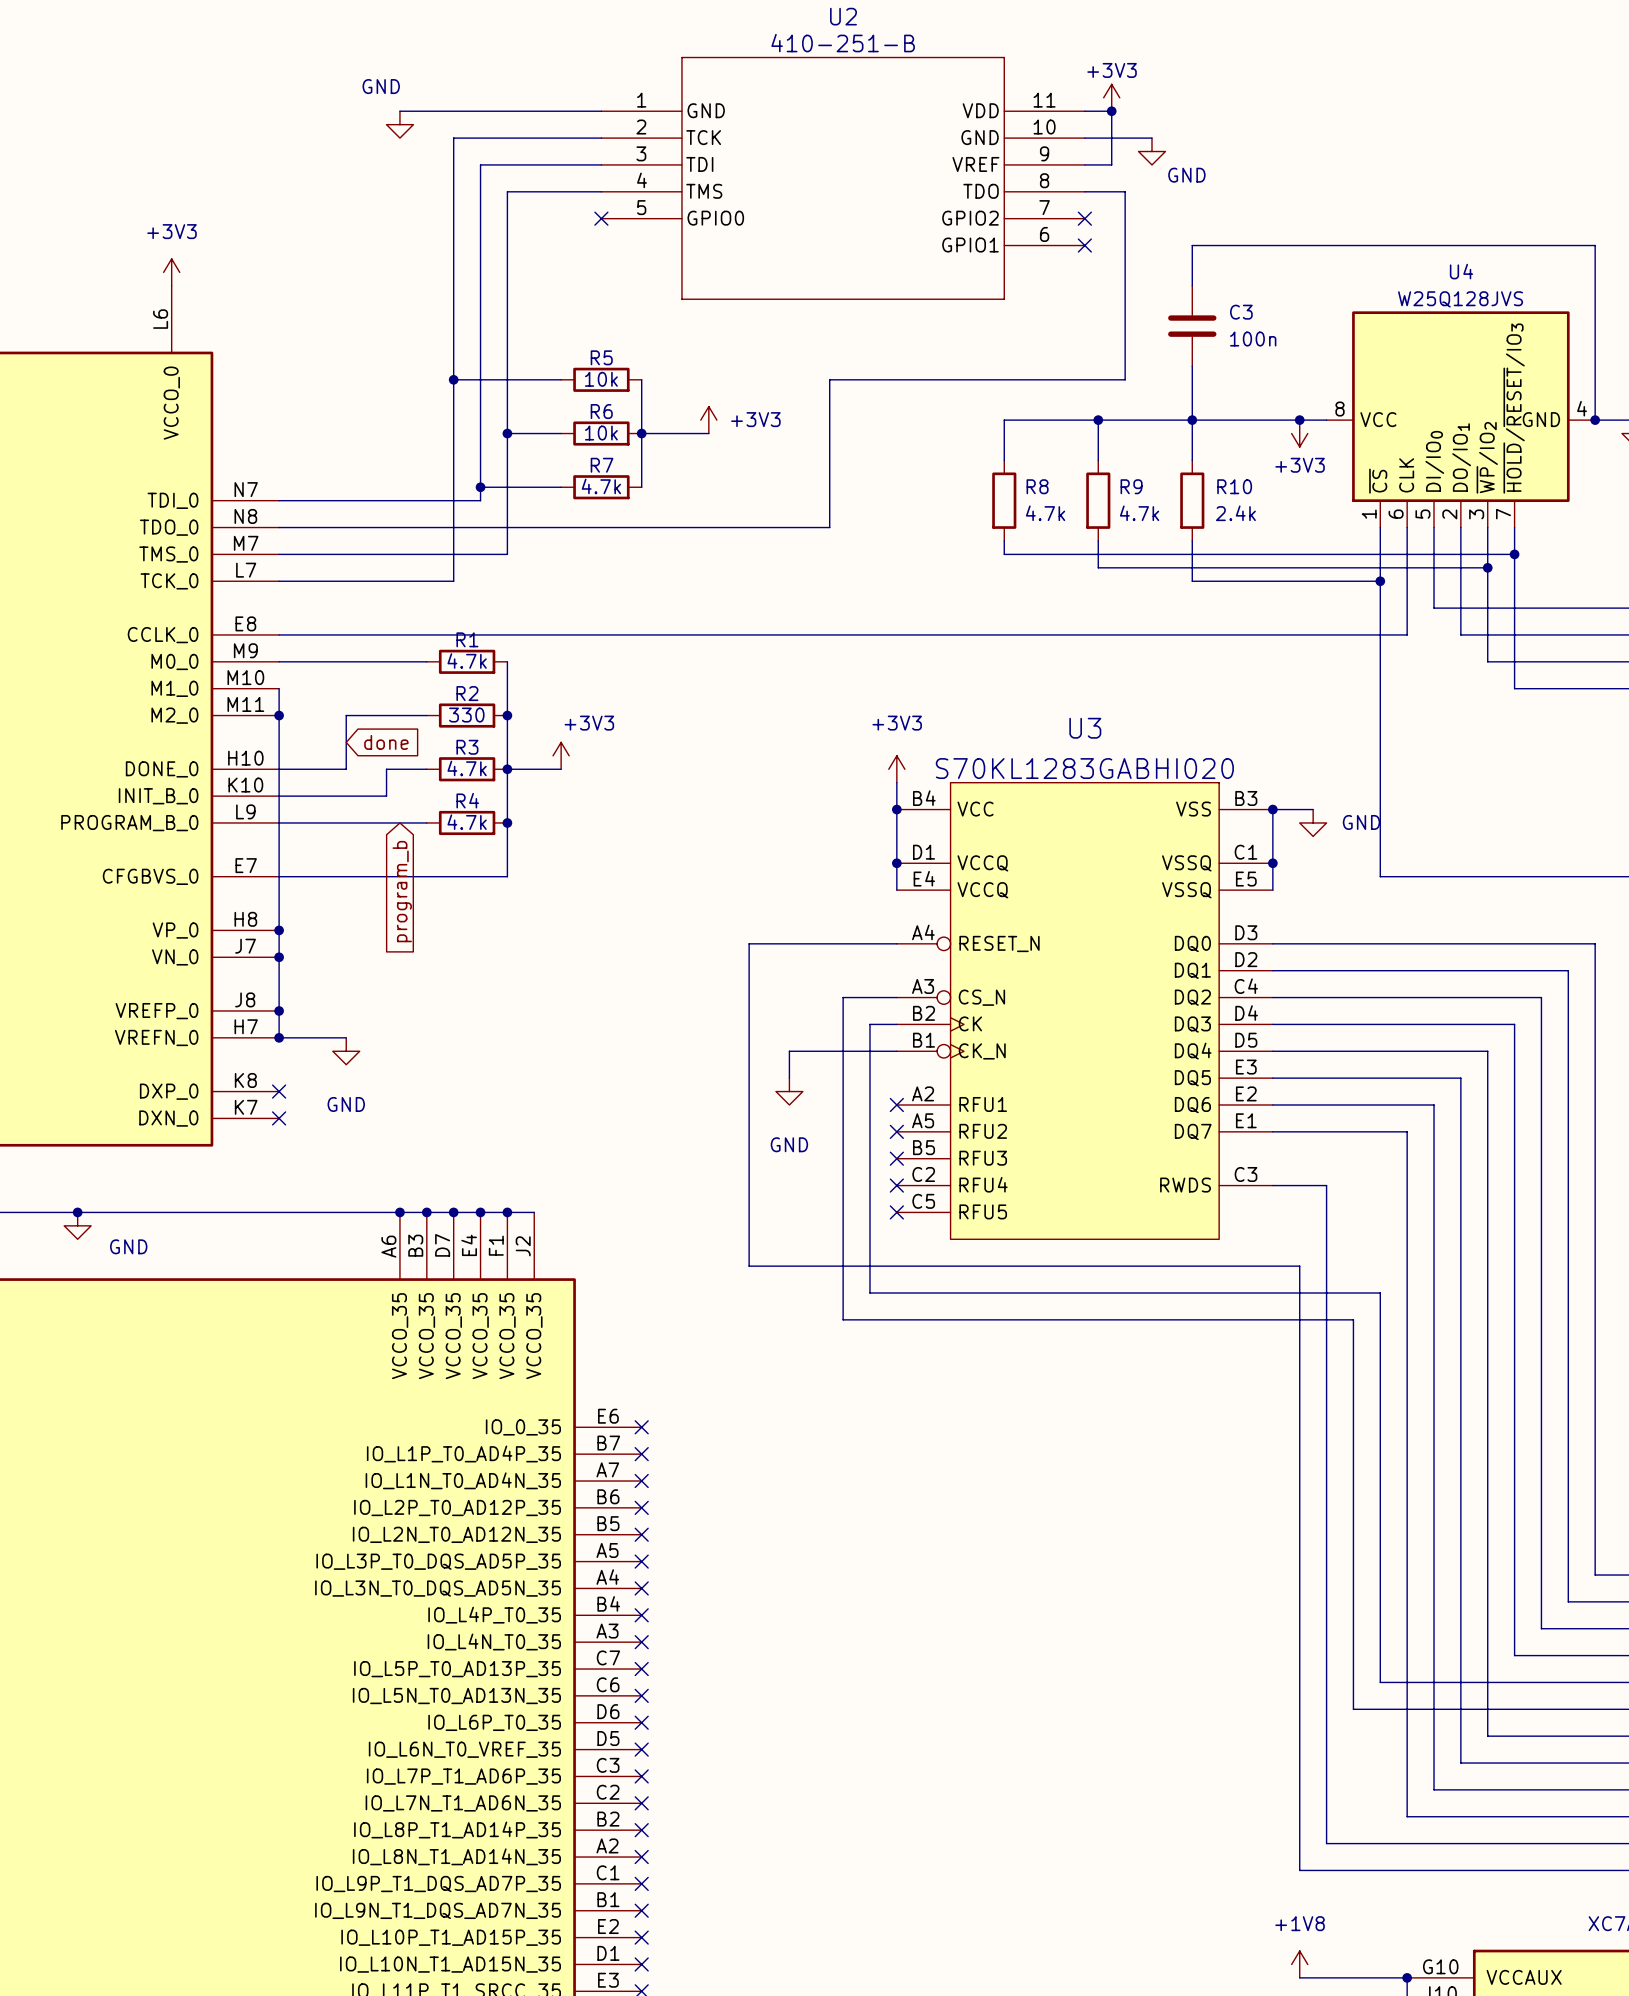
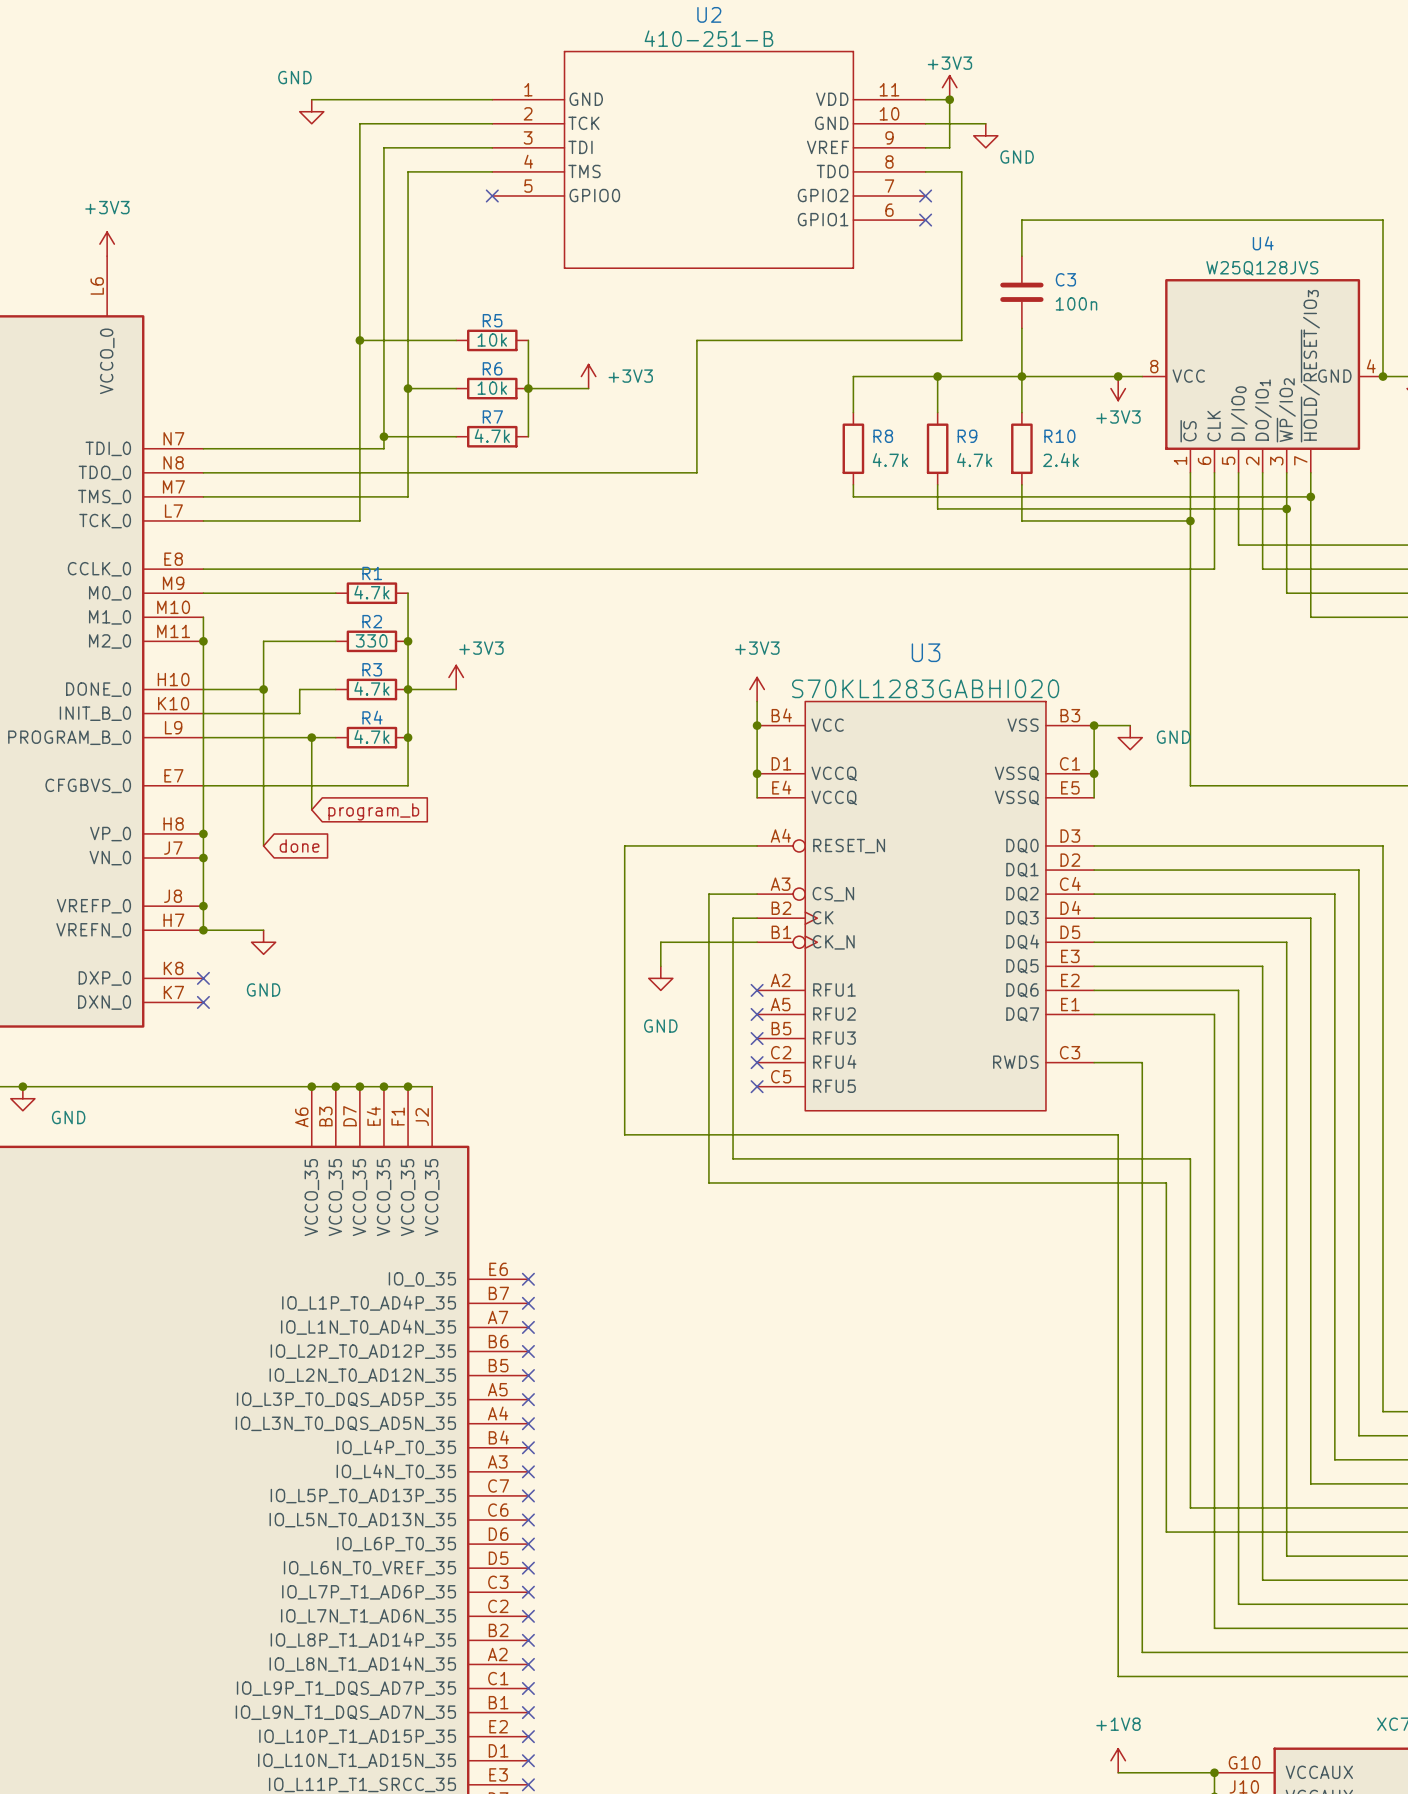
global label position: done (386, 742) -> done (299, 845)
wire: none -> (263, 689) (263, 845)
junction: none -> (263, 689)
wire: none -> (311, 737) (311, 809)
junction: none -> (311, 737)
global label rotation: 0° (402, 891) -> 90° counterclockwise (373, 811)

